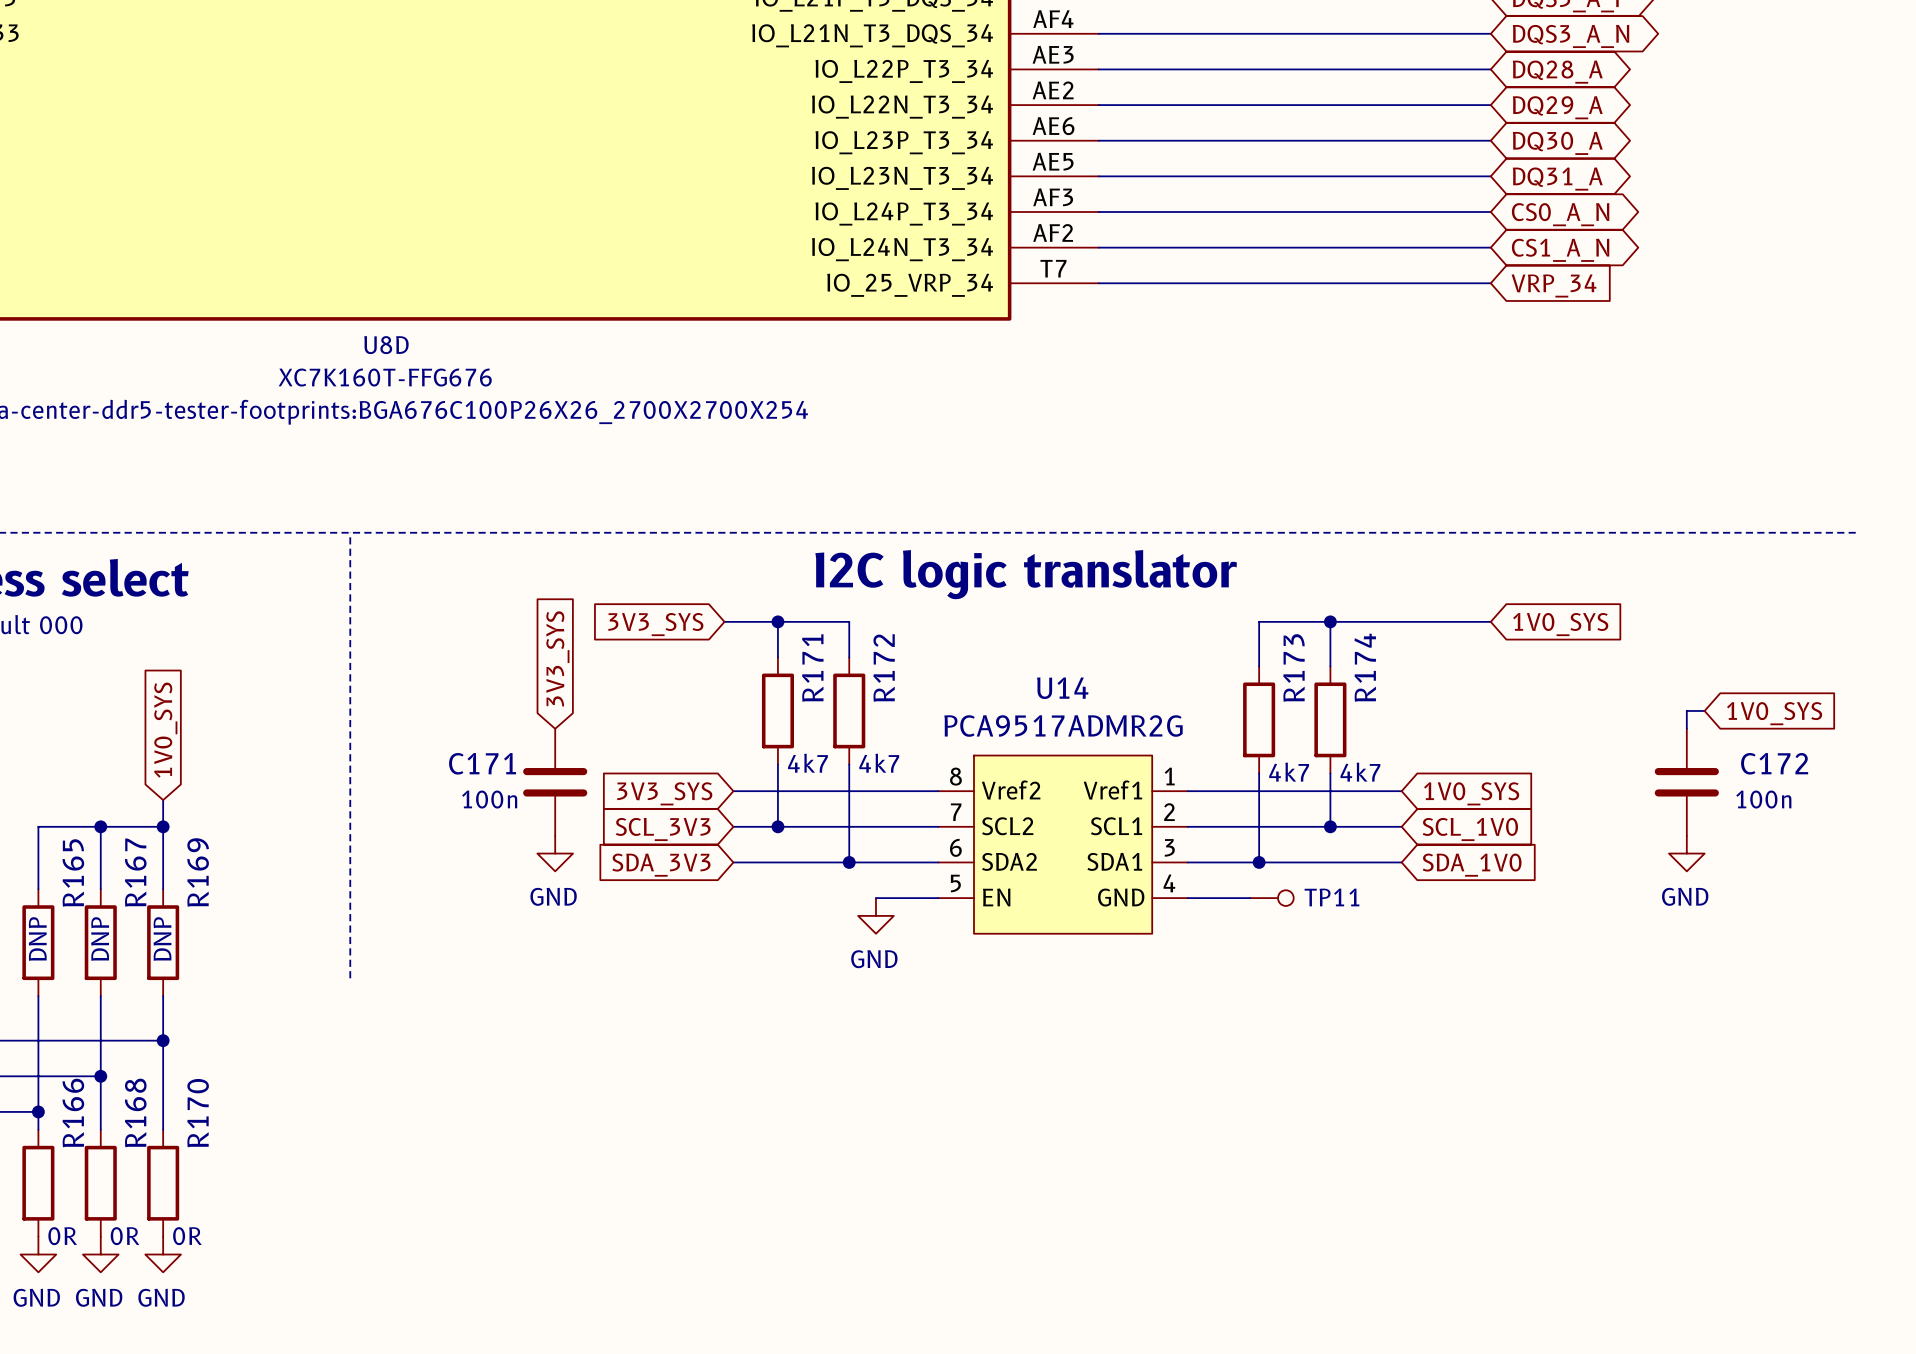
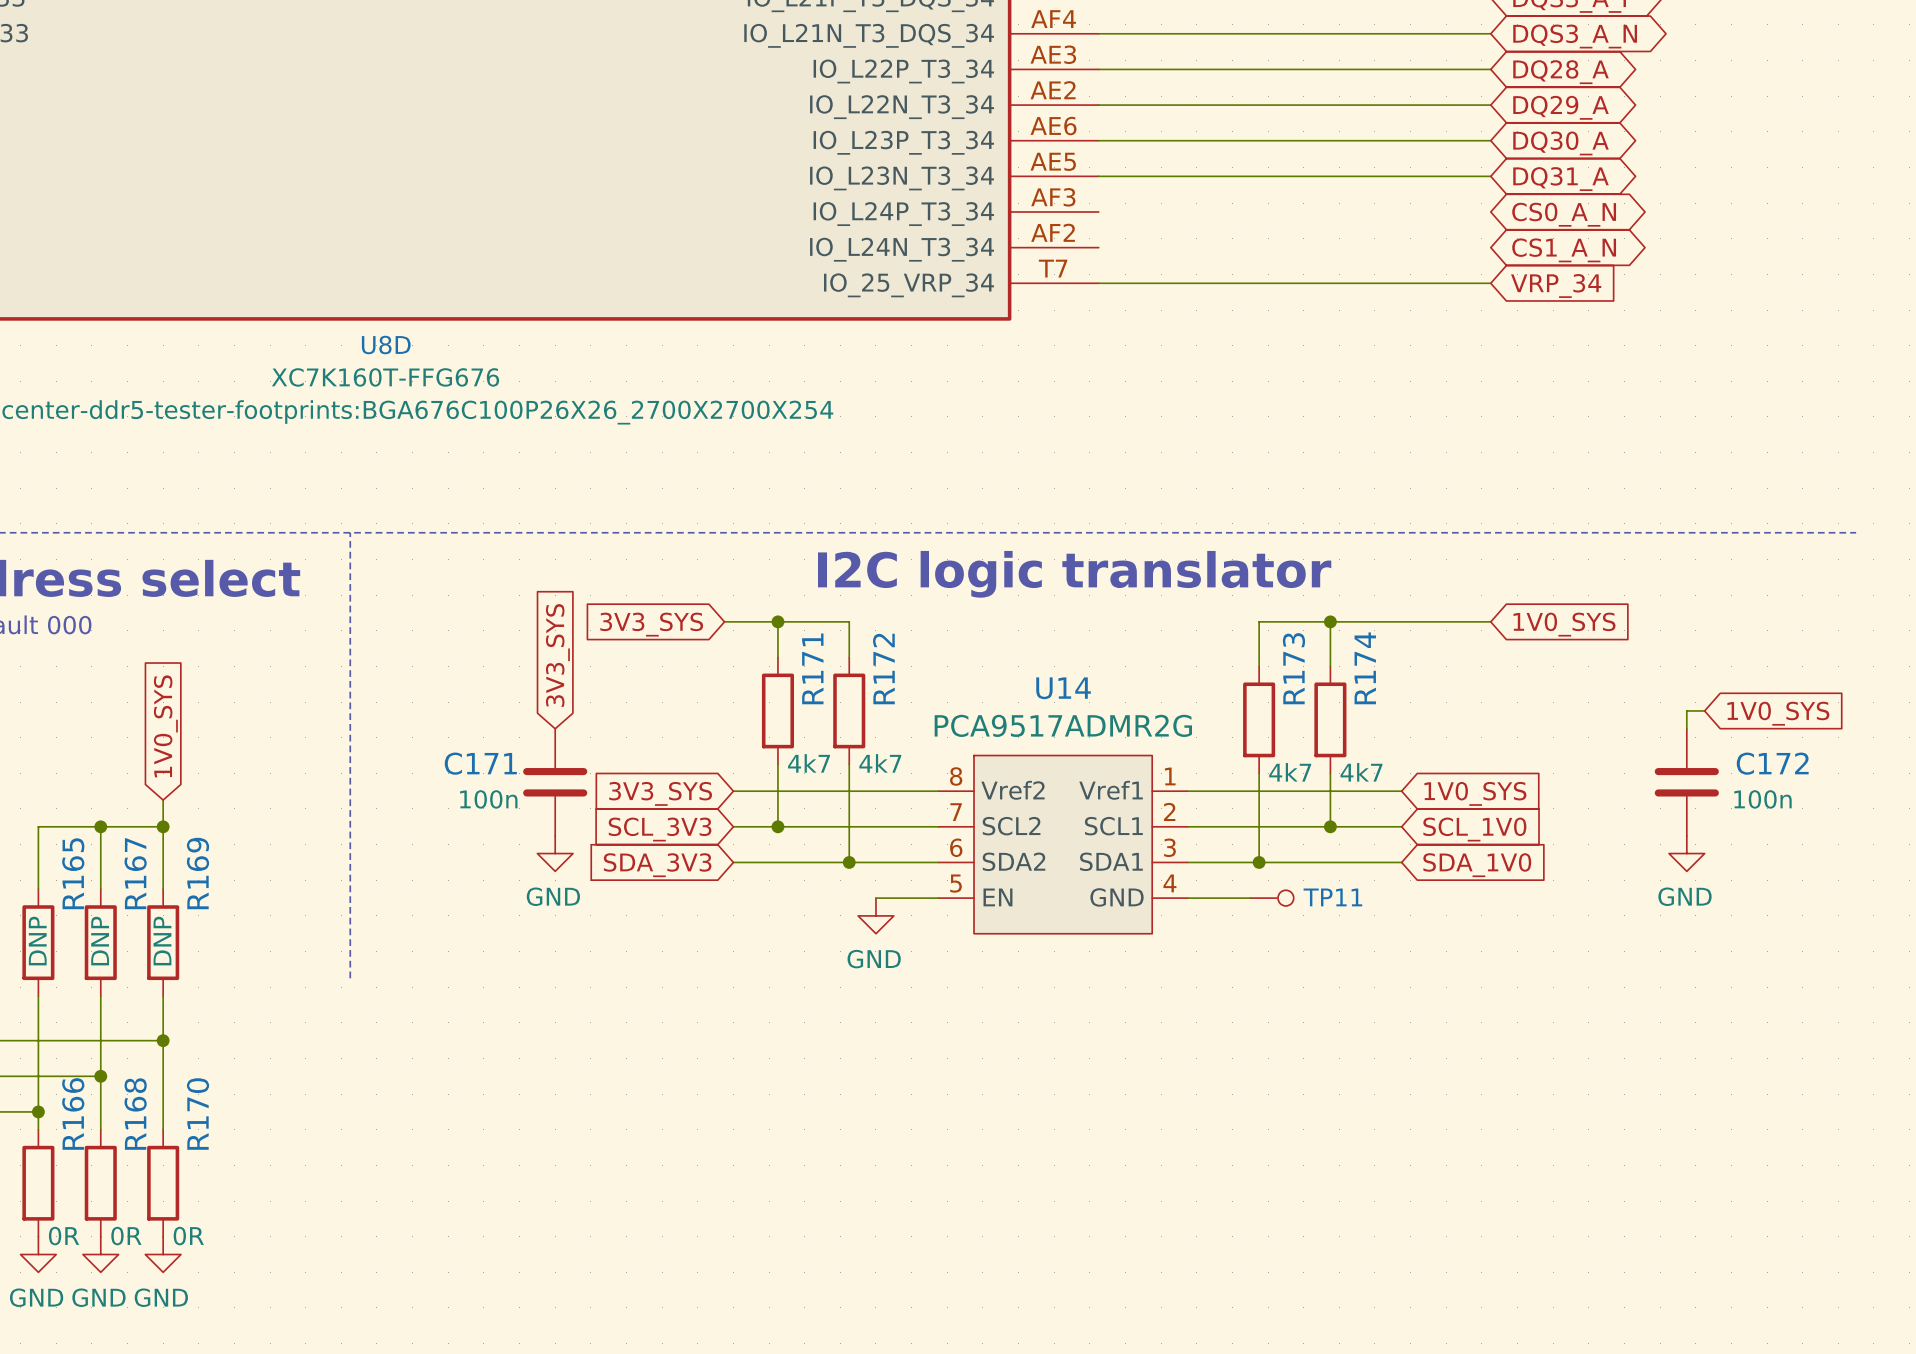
wire: (1098, 212) (1490, 212) -> none
wire: (1098, 247) (1490, 247) -> none

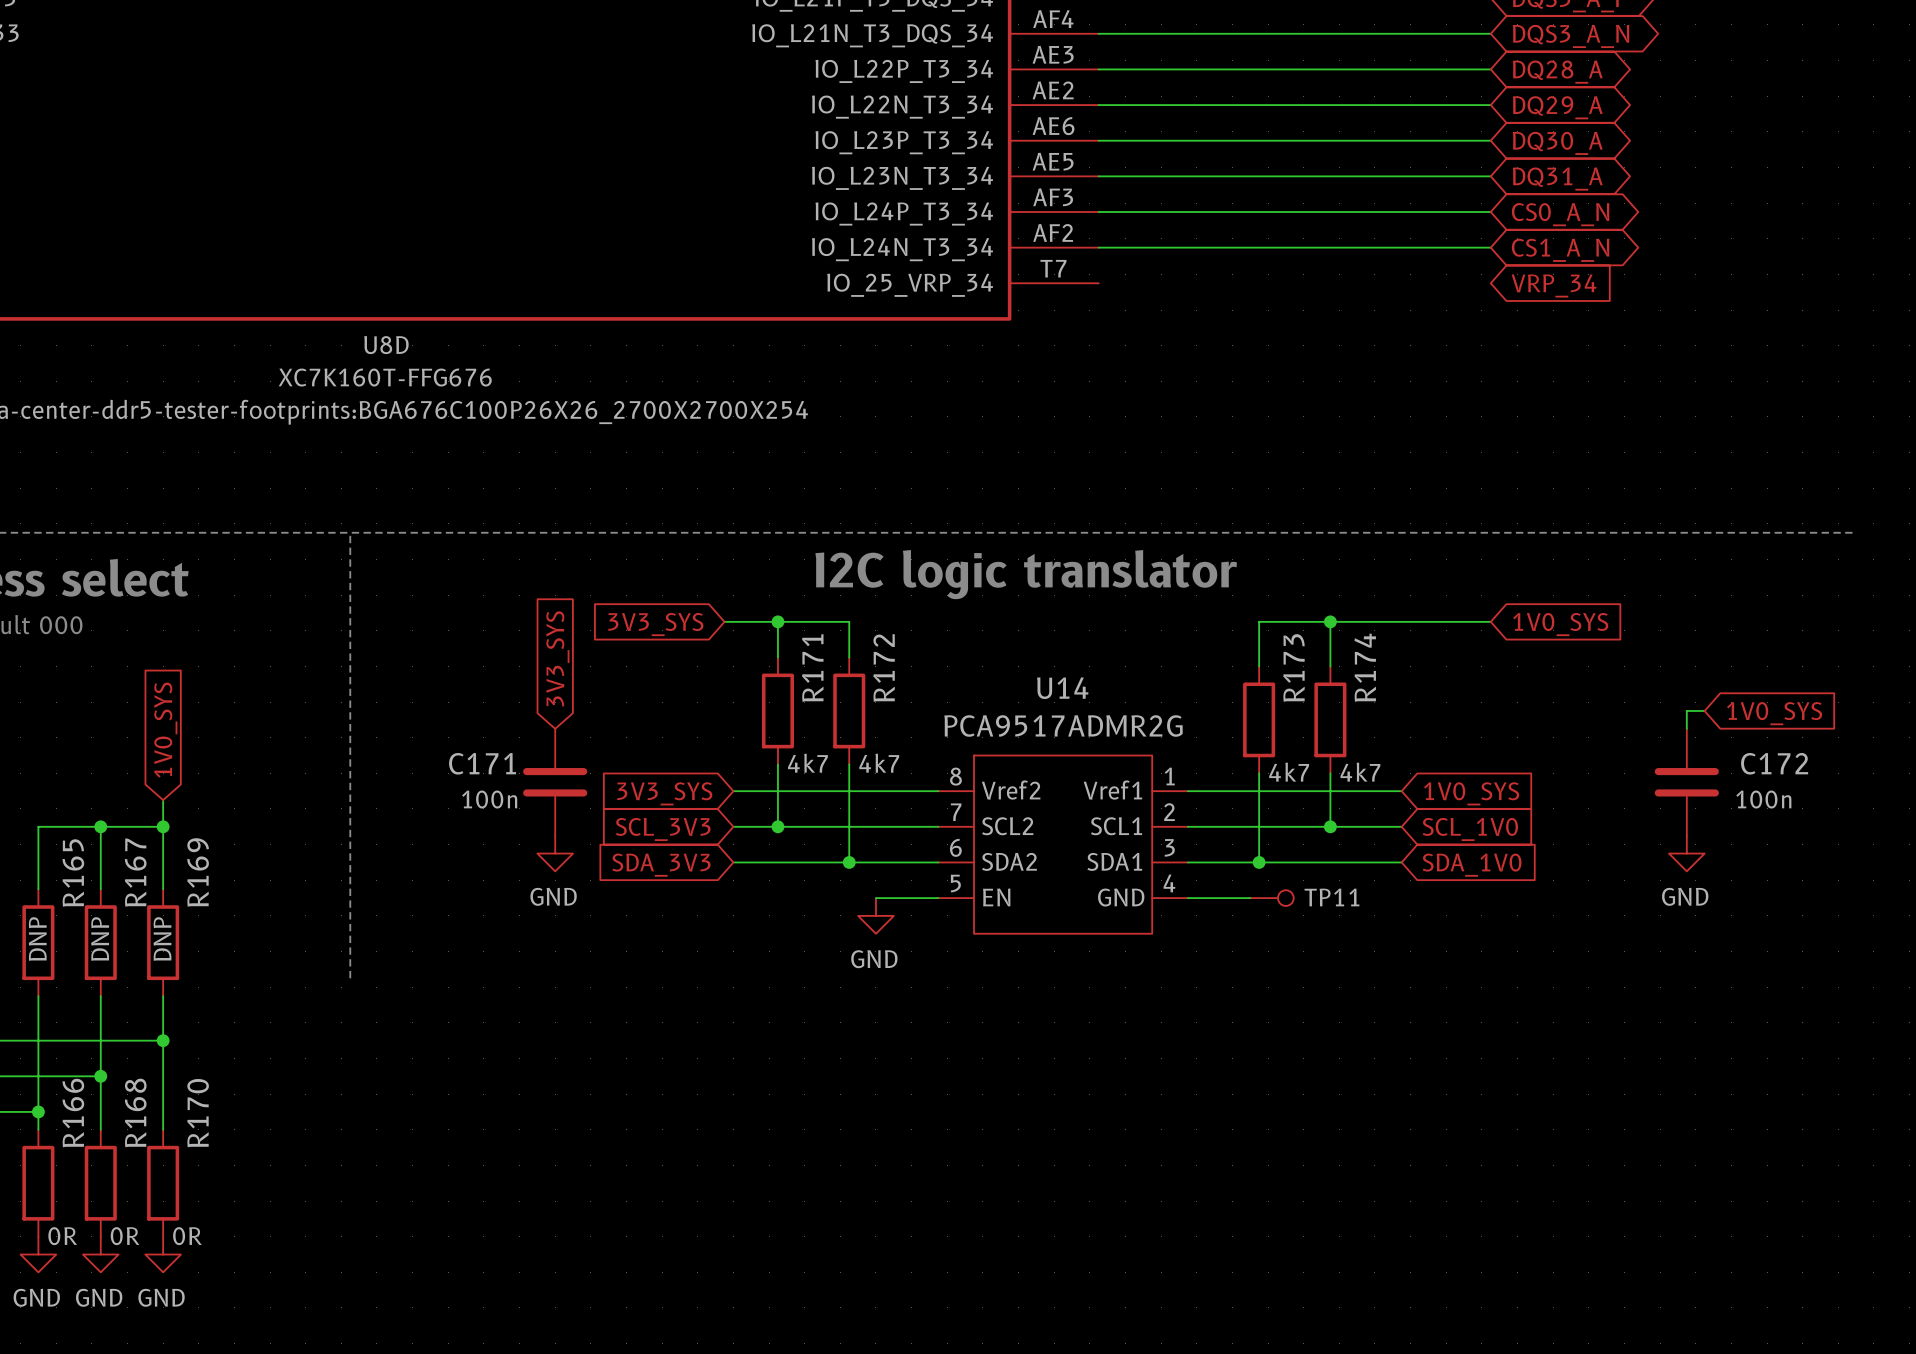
wire: none -> (1098, 212) (1490, 212)
wire: (1098, 283) (1490, 283) -> (1098, 247) (1490, 247)

